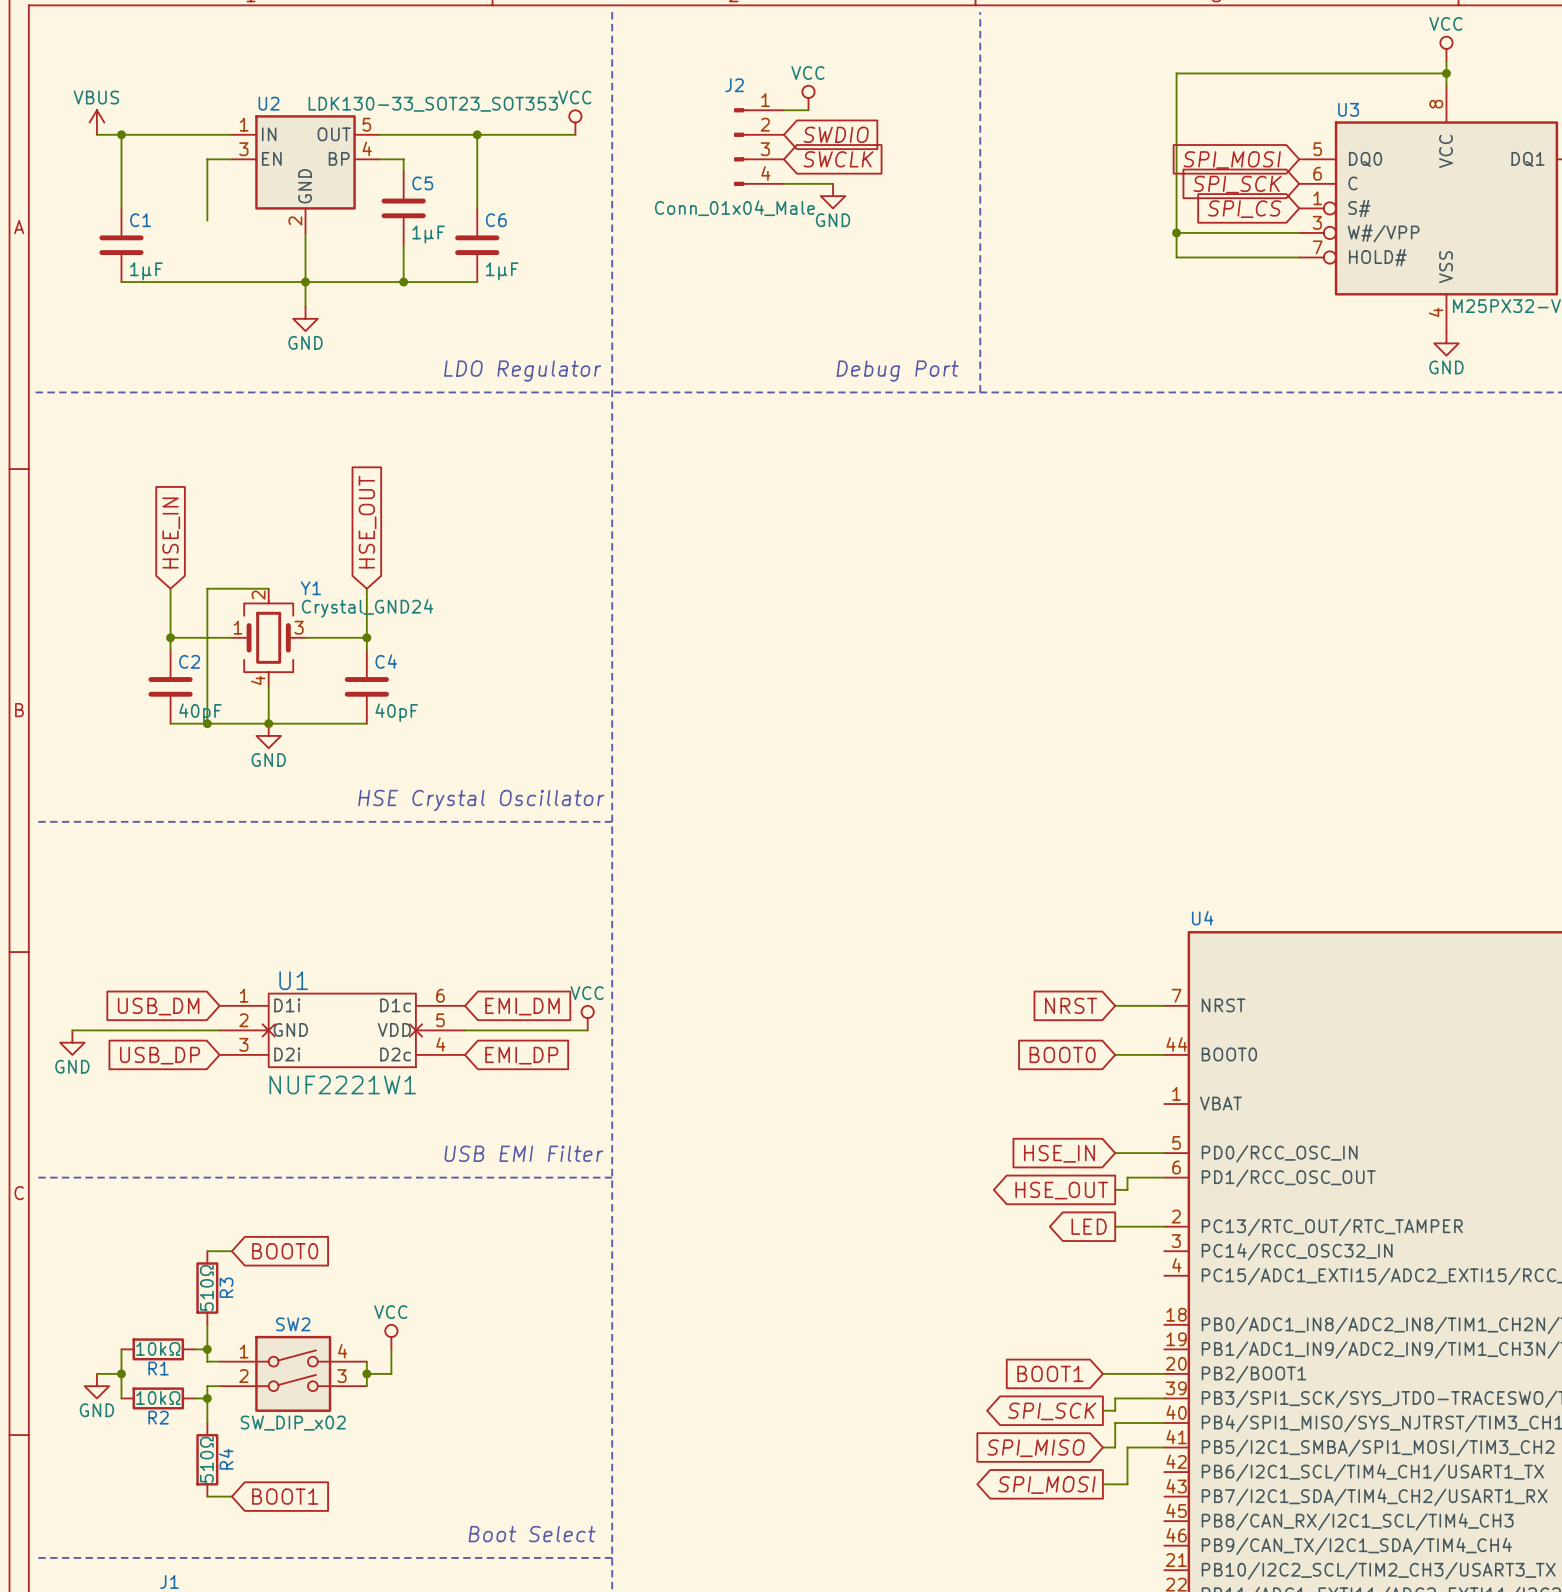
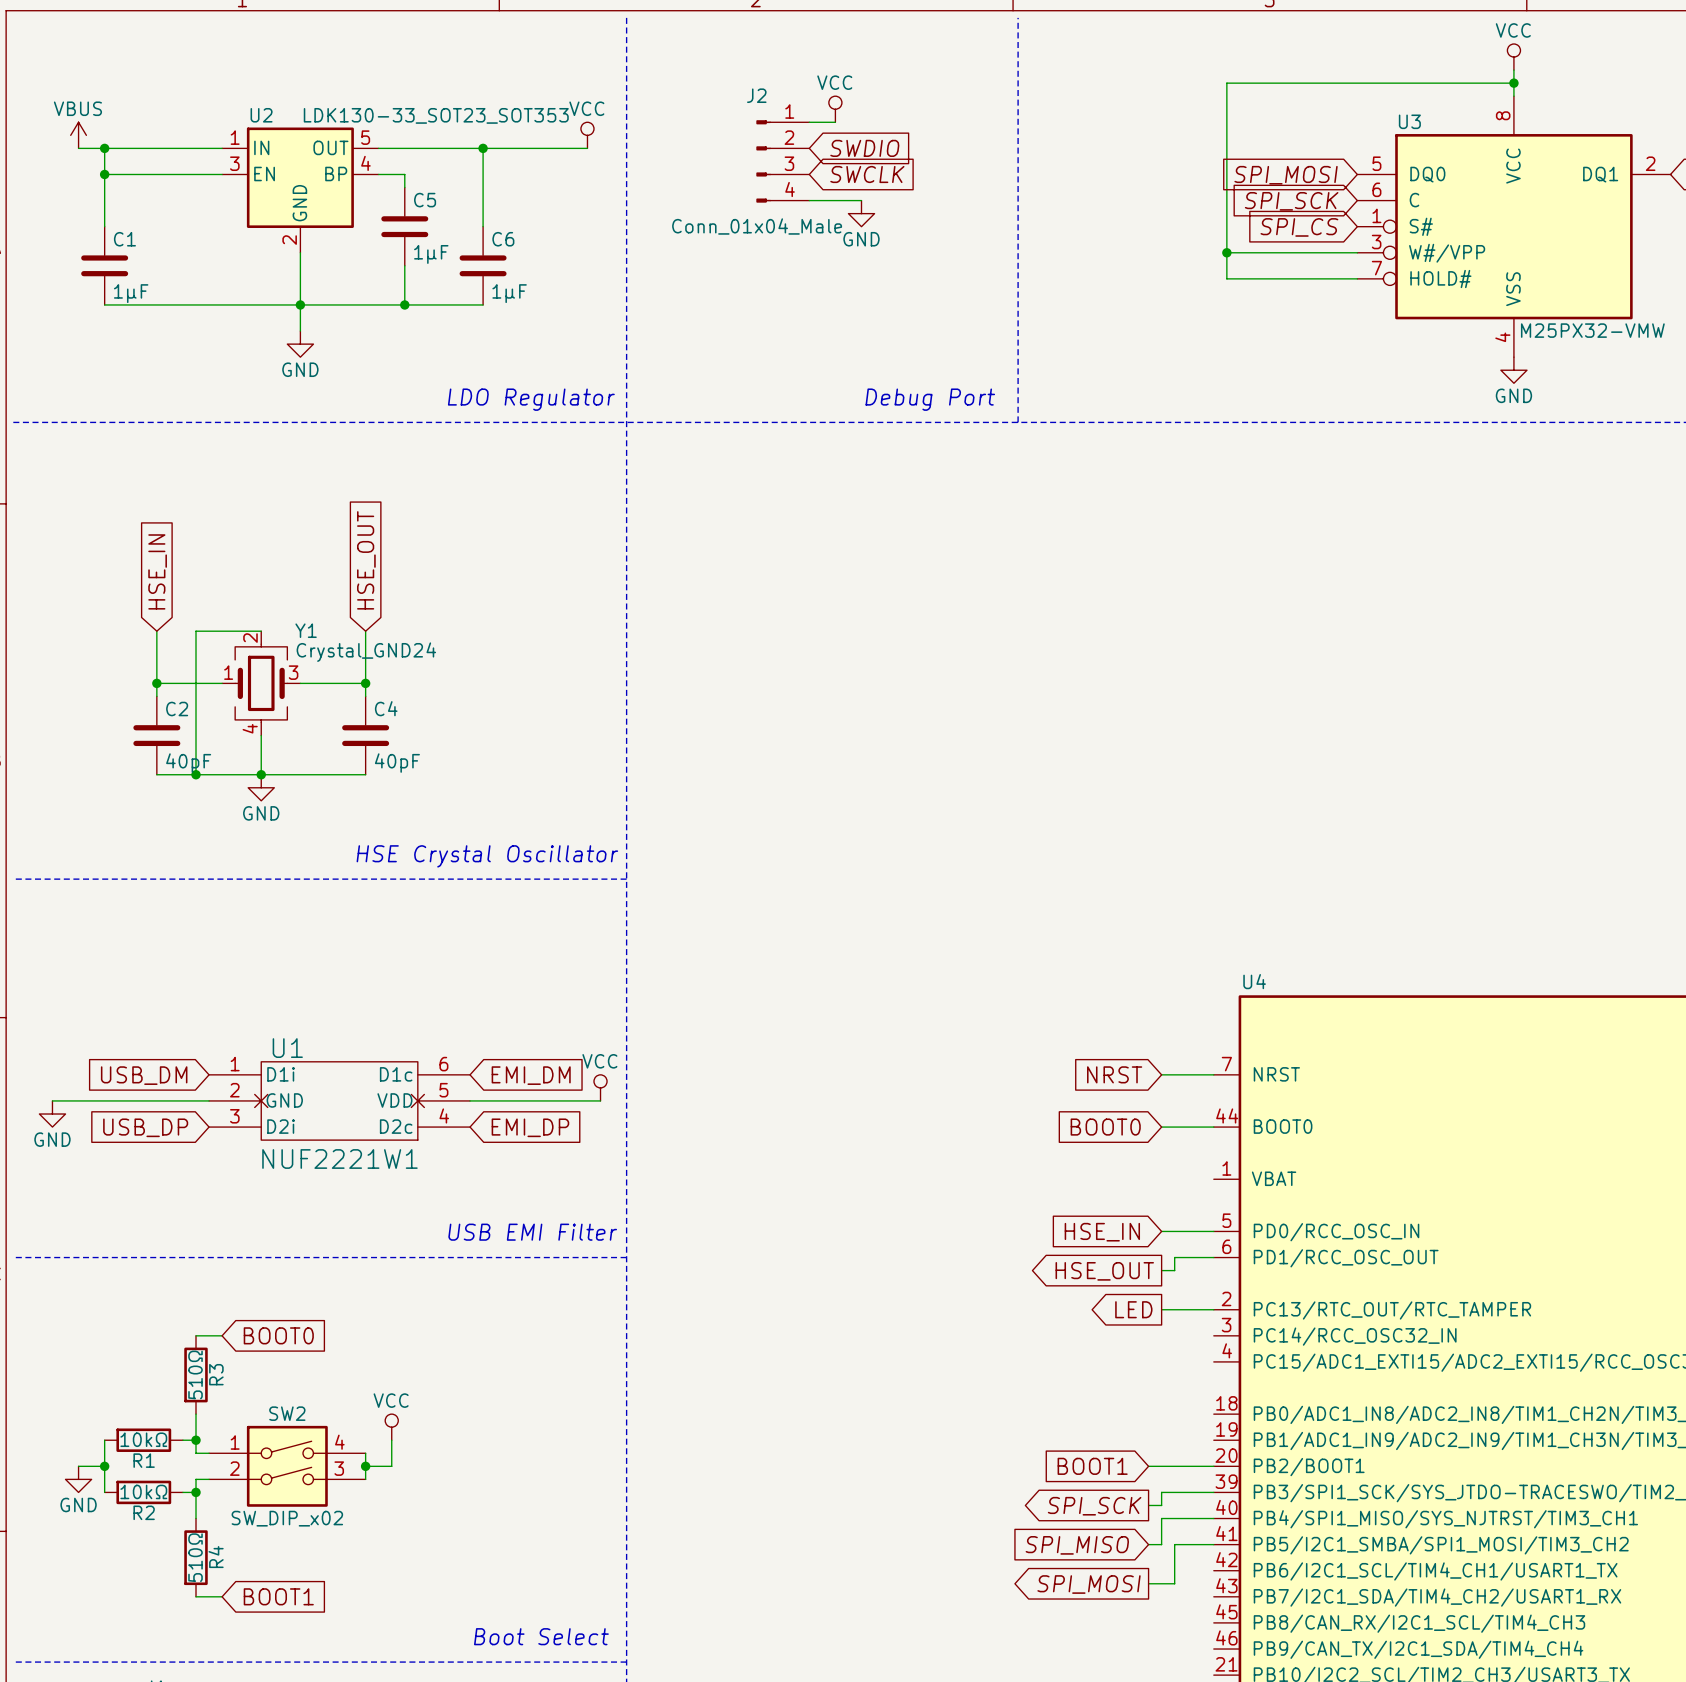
junction: none -> (104, 174)
wire: (207, 159) (207, 220) -> (196, 174) (104, 174)

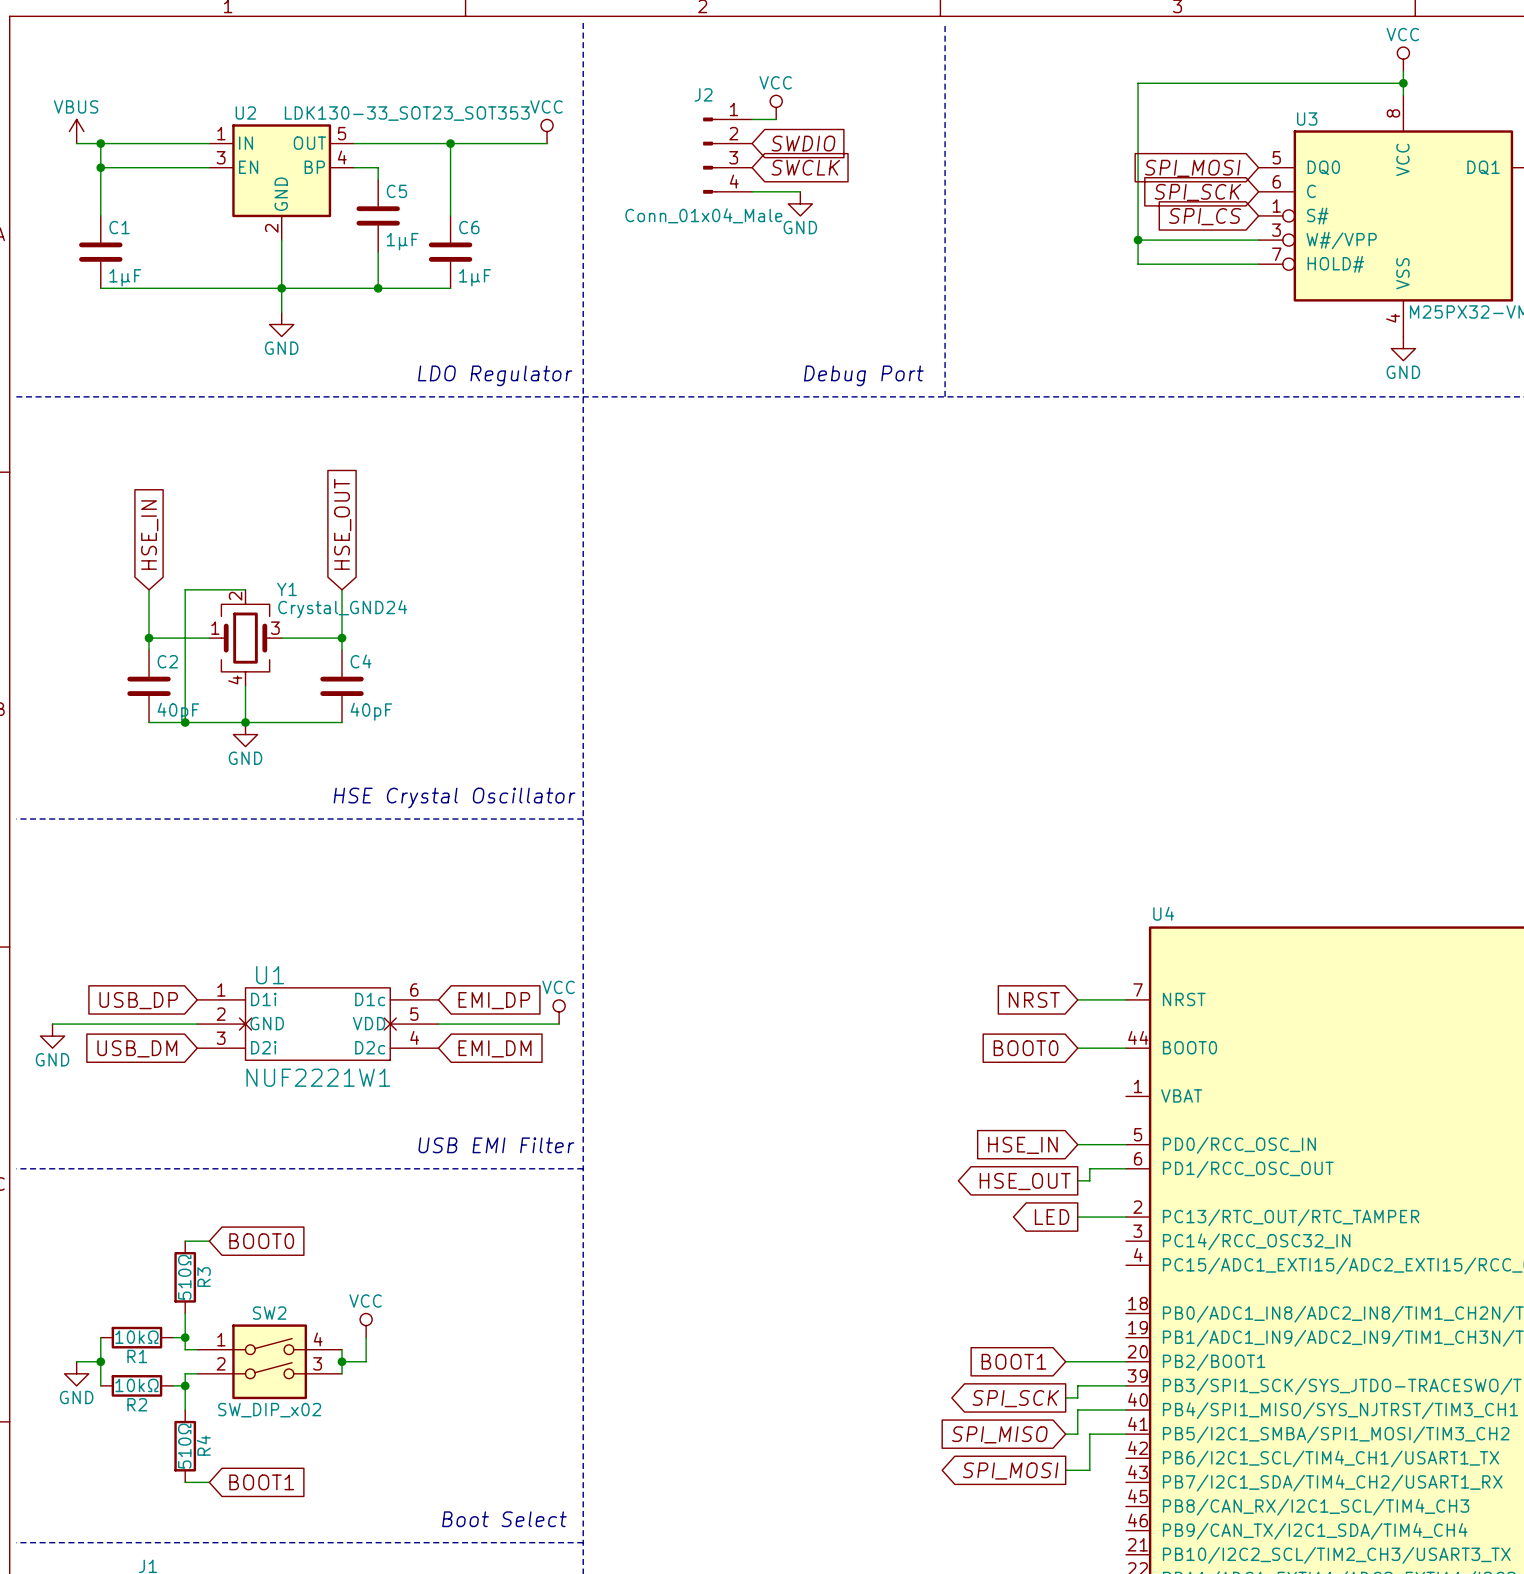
global label: USB_DM (144, 1075) -> USB_DP (138, 1000)
global label: EMI_DM (531, 1075) -> EMI_DP (494, 1000)
global label: USB_DP (145, 1127) -> USB_DM (137, 1048)
global label: EMI_DP (530, 1127) -> EMI_DM (495, 1048)

